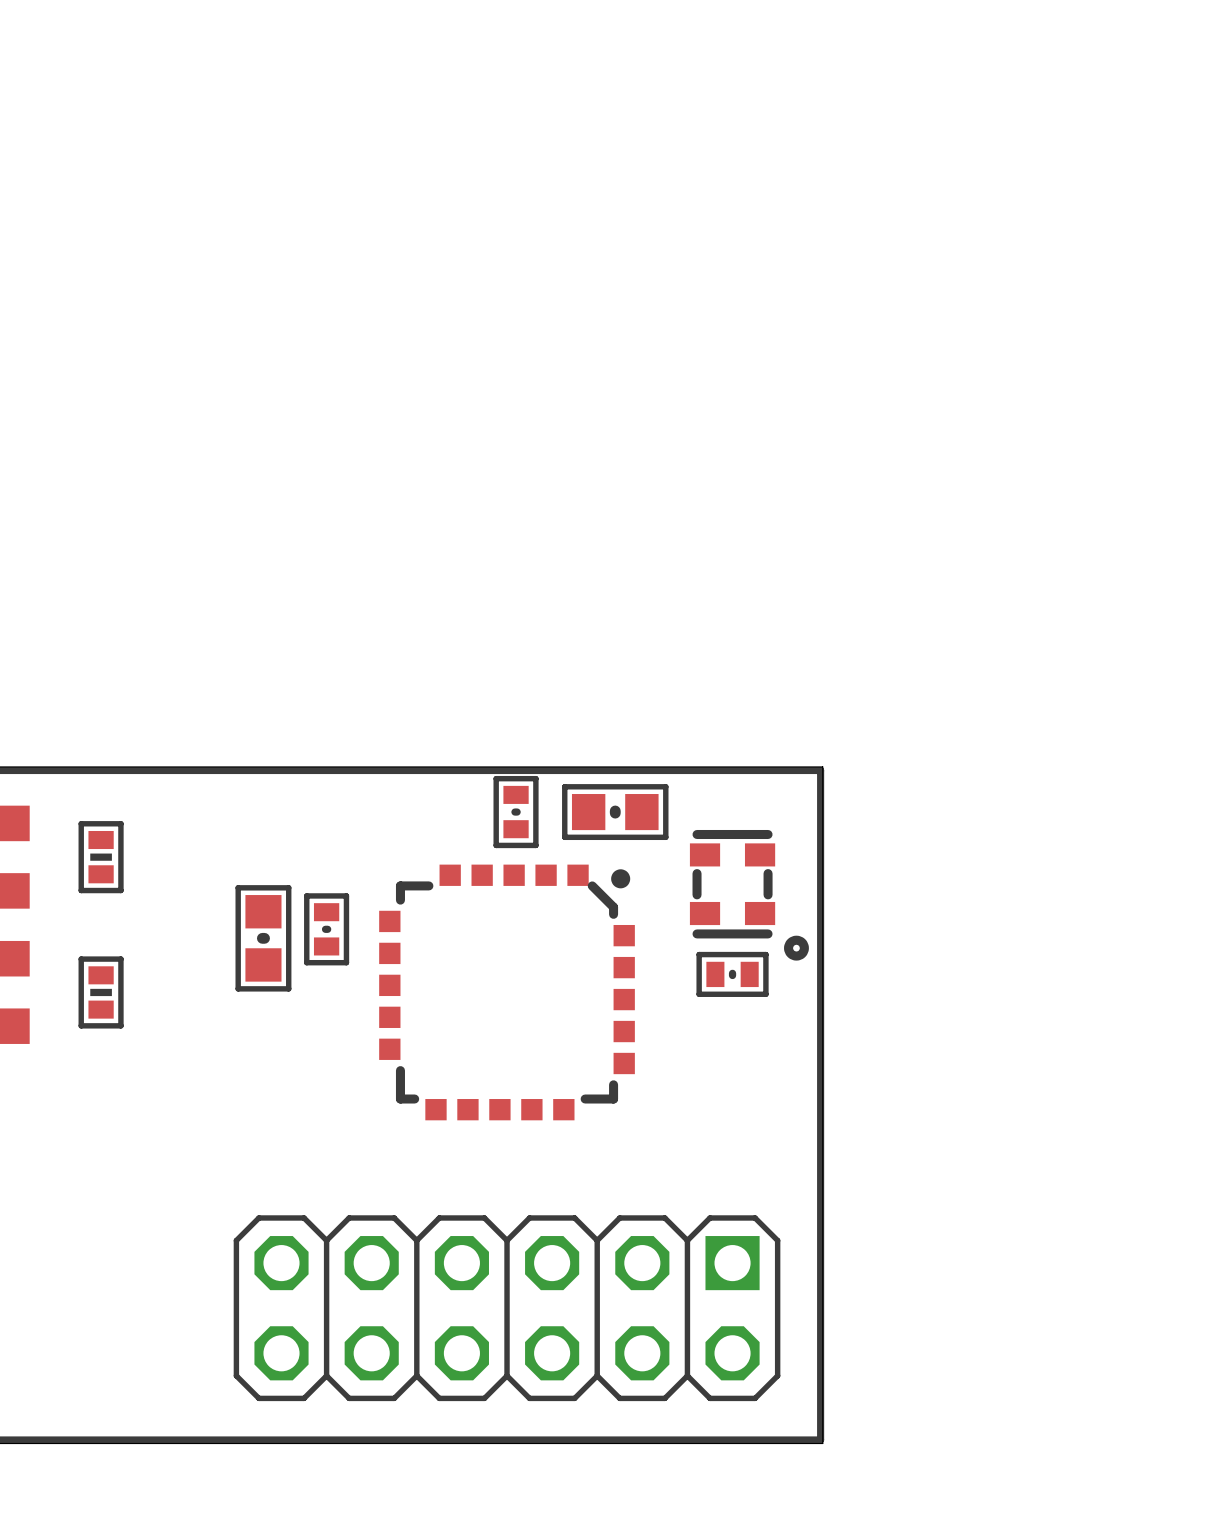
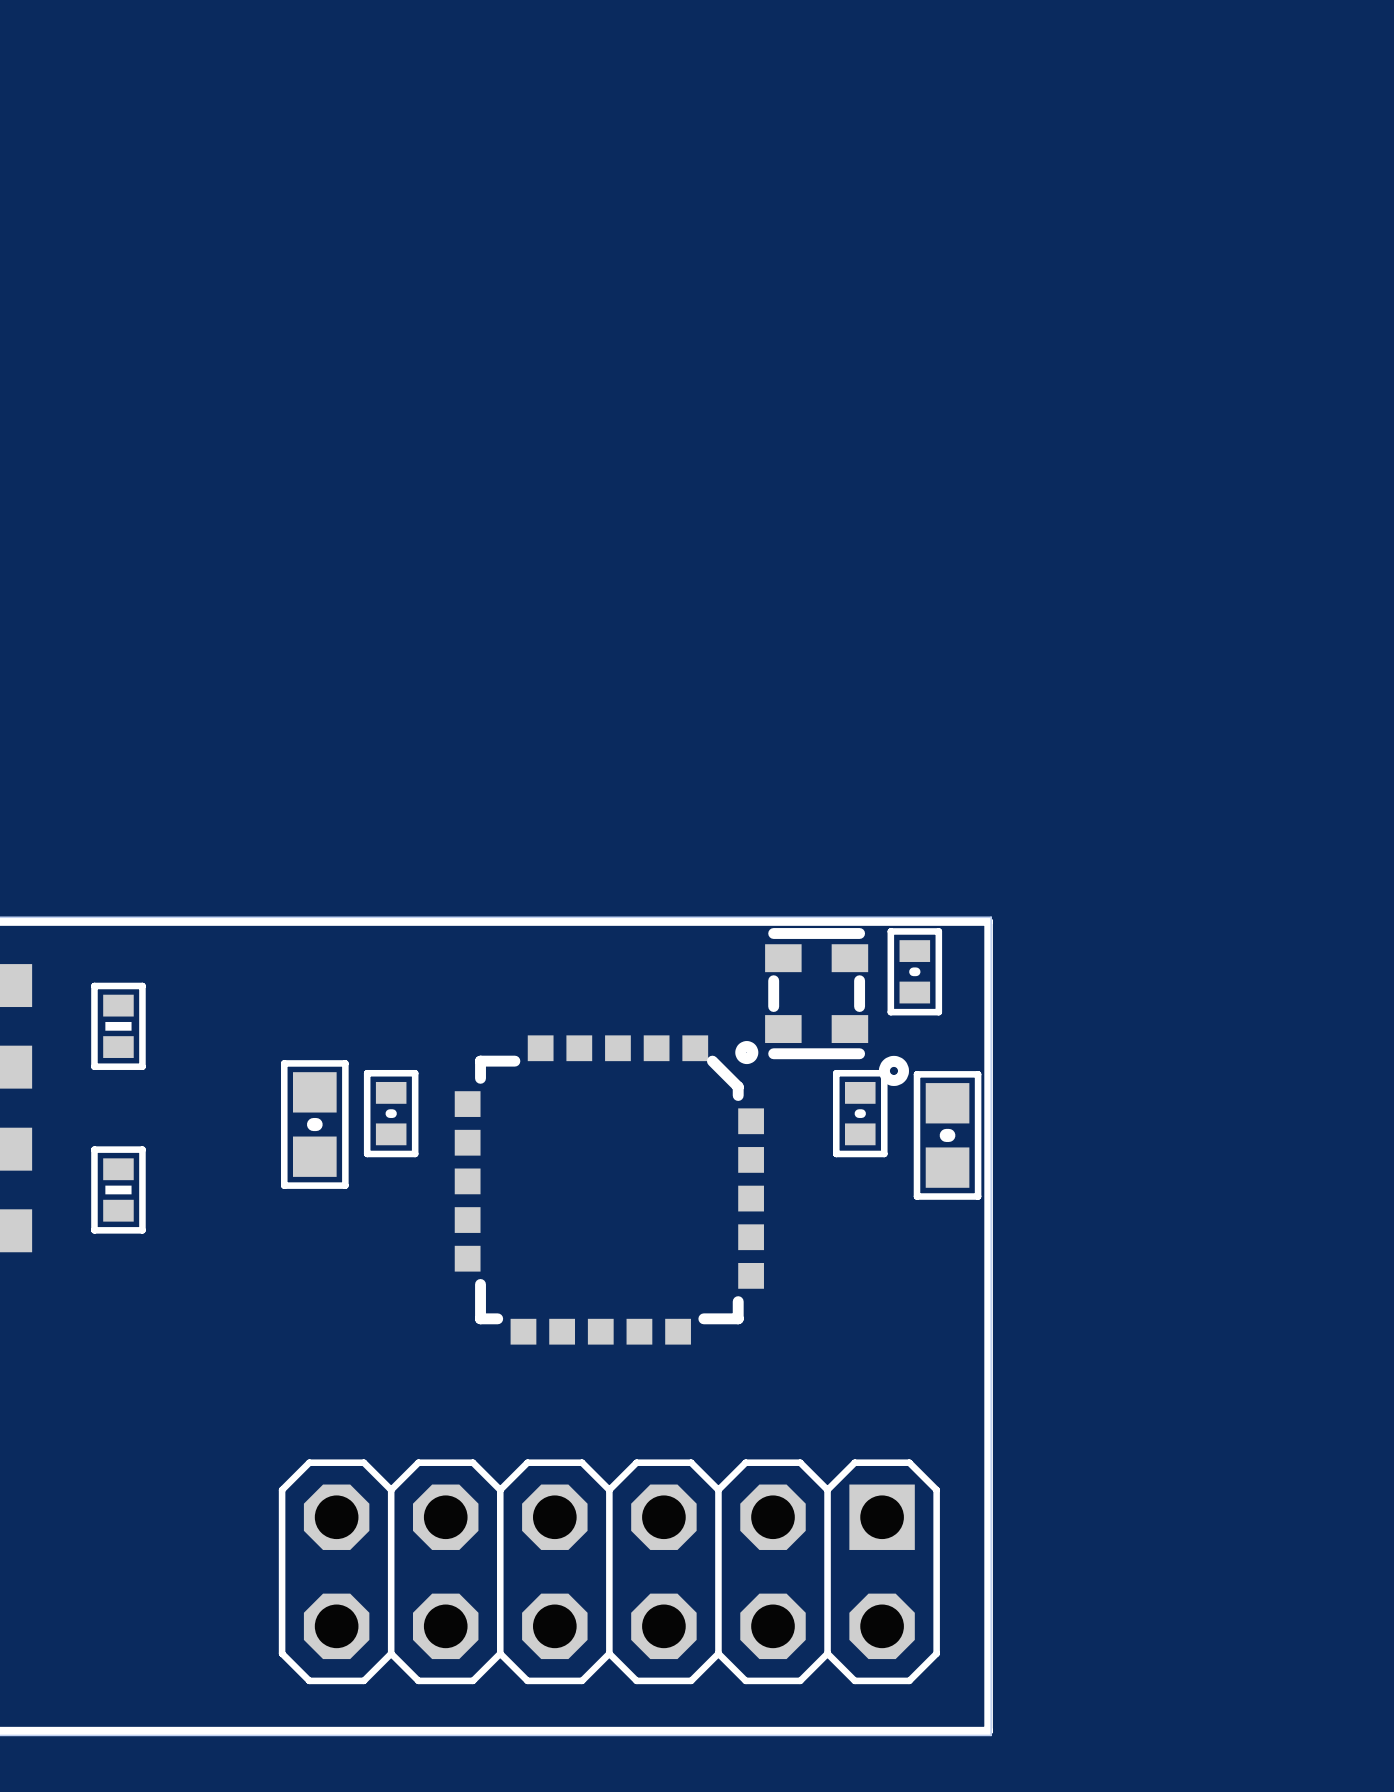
part: (516, 812) -> none
part rotation: 0° (615, 812) -> 90° clockwise (947, 1135)
part position: (615, 812) -> (947, 1135)
part: none -> (914, 971)
part position: (749, 895) -> (837, 1007)
part rotation: 0° (732, 974) -> 90° clockwise (860, 1113)
part position: (732, 974) -> (860, 1113)

